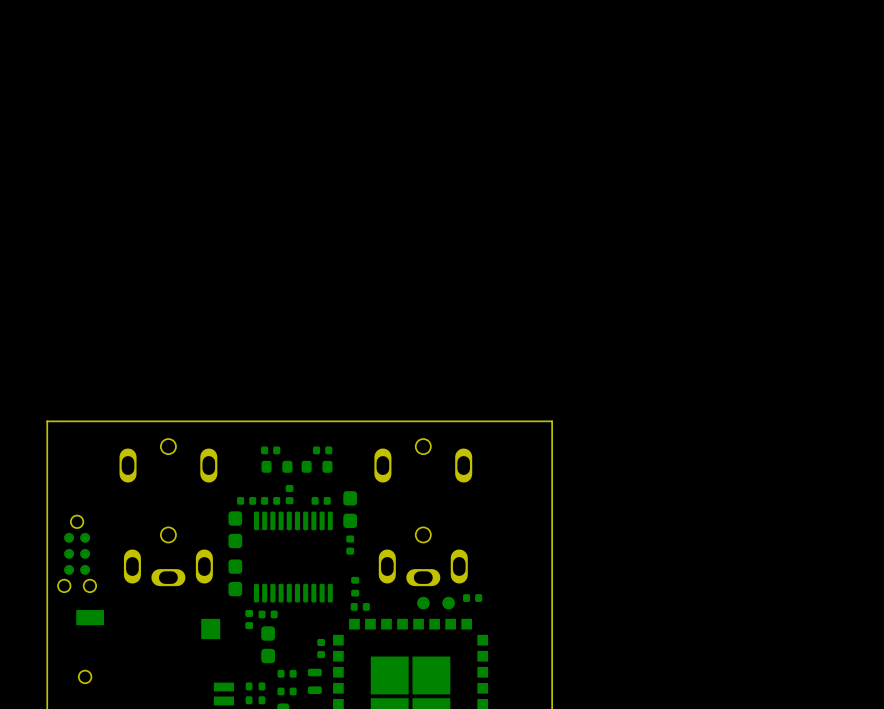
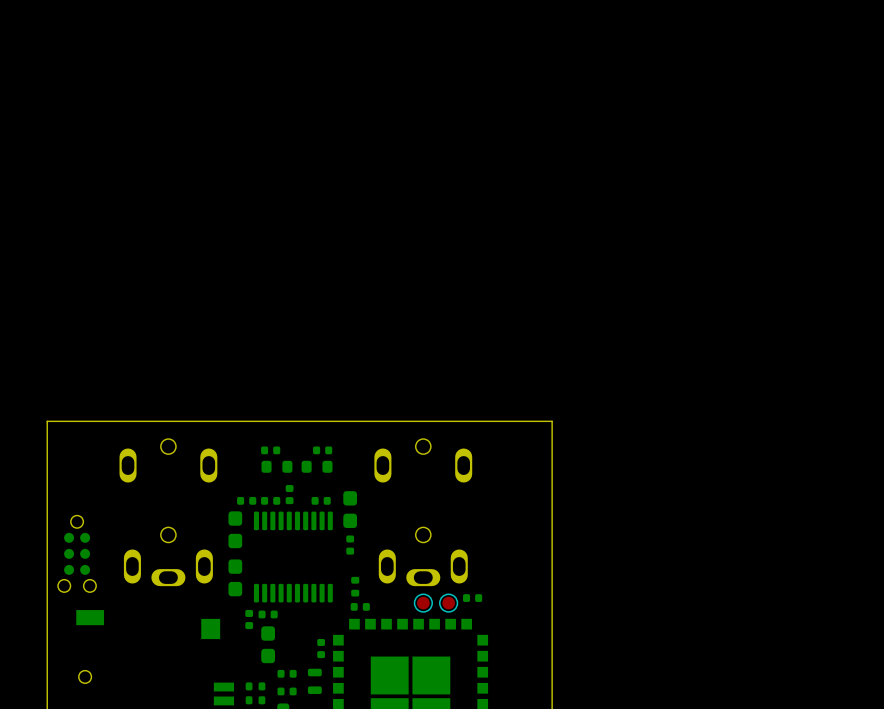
part side: bottom (423, 603) -> top (423, 603)
part side: bottom (448, 603) -> top (448, 603)

